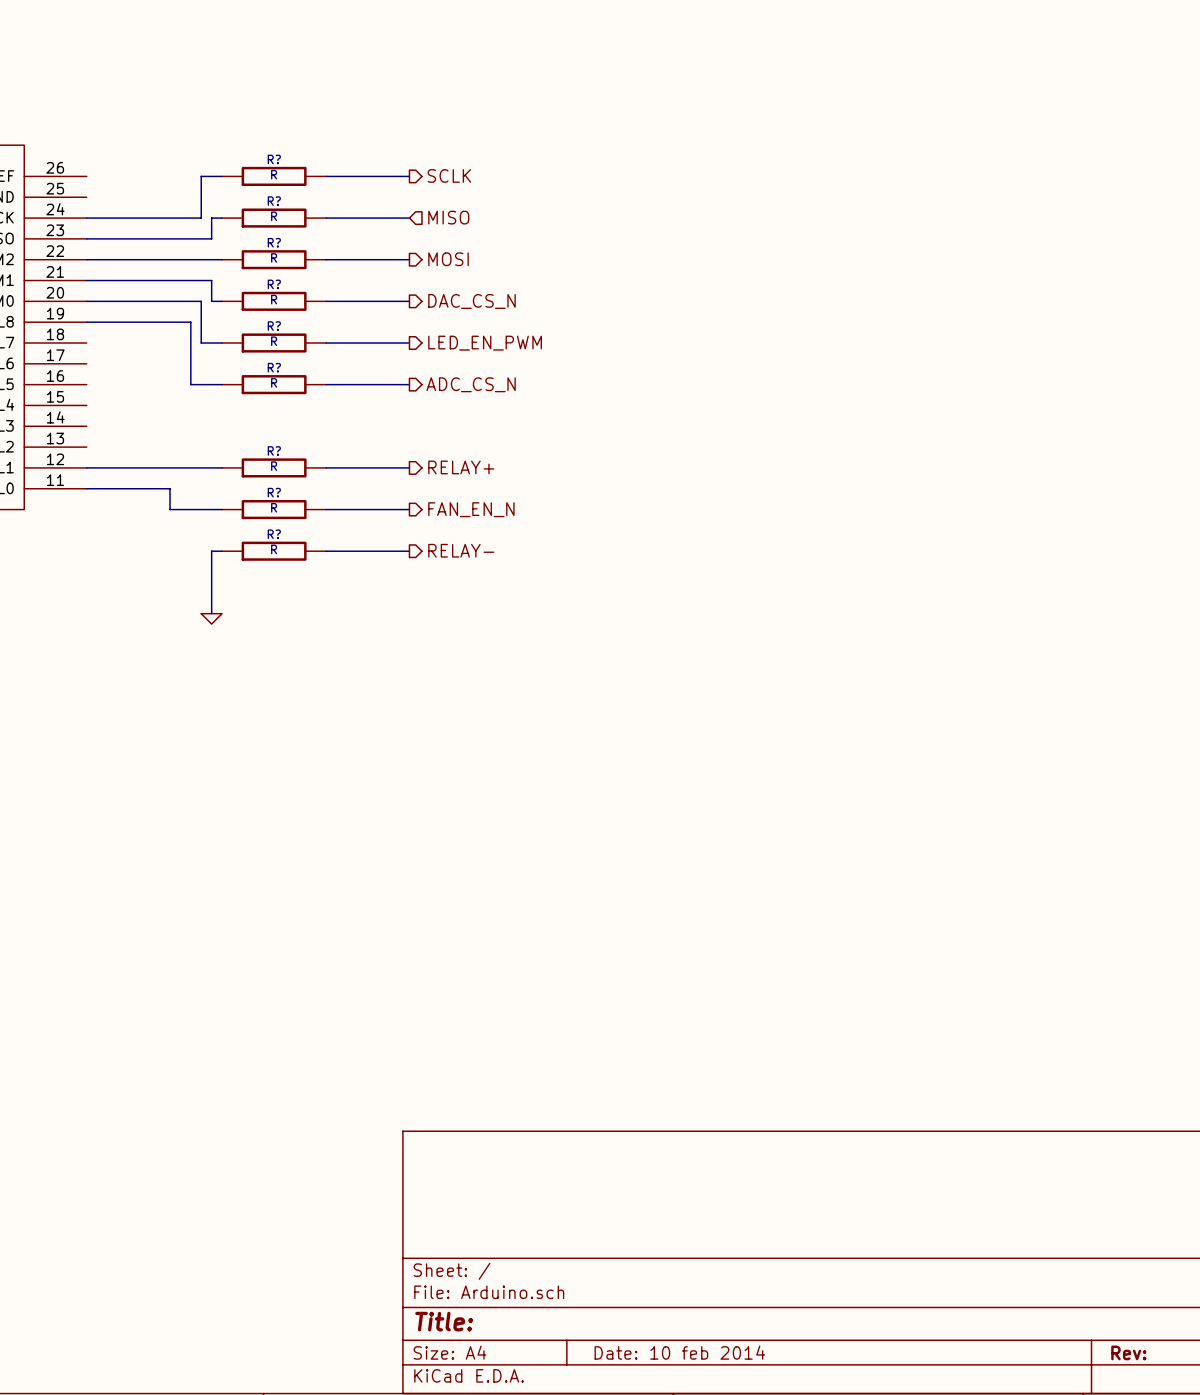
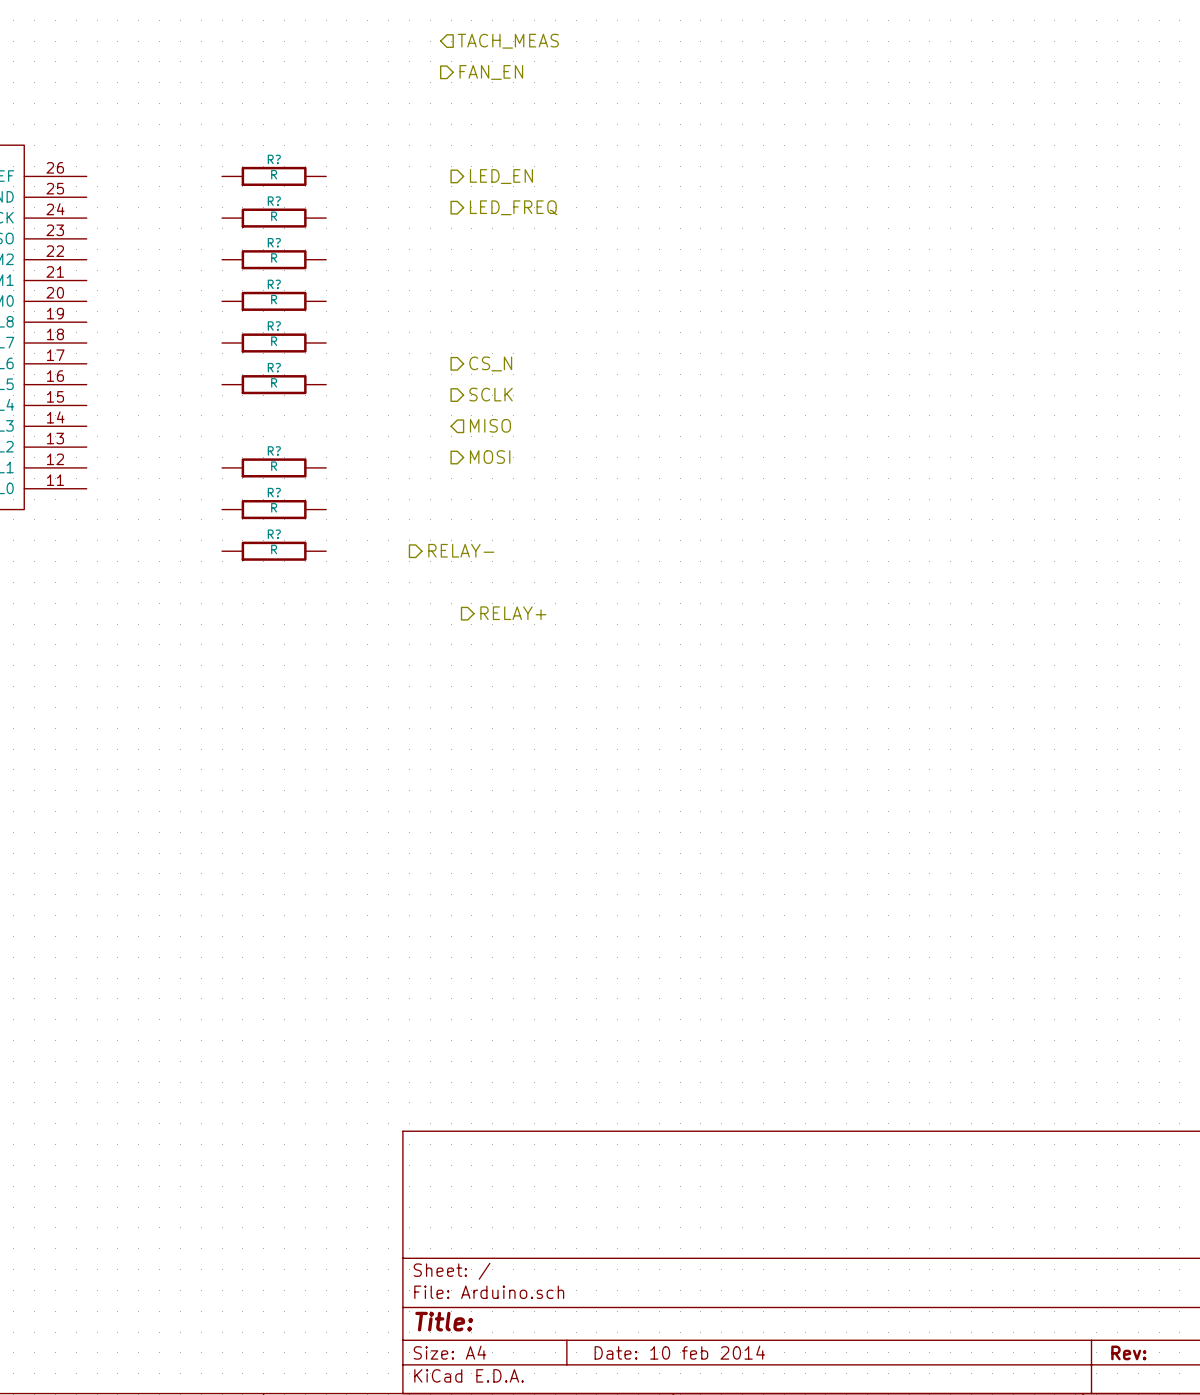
hierarchical label: none -> TACH_MEAS (508, 41)
hierarchical label: none -> FAN_EN (491, 72)
hierarchical label: SCLK (449, 175) -> none
wire: (222, 176) (201, 176) (201, 218) (86, 218) -> none
wire: (326, 176) (409, 176) -> none
hierarchical label: none -> LED_EN (501, 176)
hierarchical label: none -> LED_FREQ (513, 207)
hierarchical label: MISO (448, 217) -> none
wire: (222, 218) (211, 218) (211, 238) (86, 238) -> none
wire: (326, 218) (409, 218) -> none
wire: (86, 259) (222, 259) -> none
wire: (326, 259) (409, 259) -> none
hierarchical label position: MOSI (448, 259) -> MOSI (490, 457)
wire: (86, 280) (211, 280) (211, 301) (222, 301) -> none
wire: (86, 301) (201, 301) (201, 343) (222, 343) -> none
wire: (326, 301) (409, 301) -> none
hierarchical label: DAC_CS_N (472, 301) -> none
wire: (86, 322) (190, 322) (190, 384) (222, 384) -> none
wire: (326, 343) (409, 343) -> none
hierarchical label: LED_EN_PWM (485, 343) -> none
wire: (326, 384) (409, 384) -> none
hierarchical label: ADC_CS_N (471, 384) -> CS_N (490, 363)
hierarchical label: none -> SCLK (491, 394)
hierarchical label: none -> MISO (490, 425)
wire: (86, 467) (222, 467) -> none
wire: (326, 467) (409, 467) -> none
hierarchical label position: RELAY+ (461, 467) -> RELAY+ (513, 613)
wire: (86, 488) (170, 488) (170, 509) (222, 509) -> none
wire: (326, 509) (409, 509) -> none
hierarchical label: FAN_EN_N (471, 509) -> none
wire: (222, 551) (211, 551) (211, 613) -> none
wire: (326, 551) (409, 551) -> none
power symbol: (211, 618) -> none

